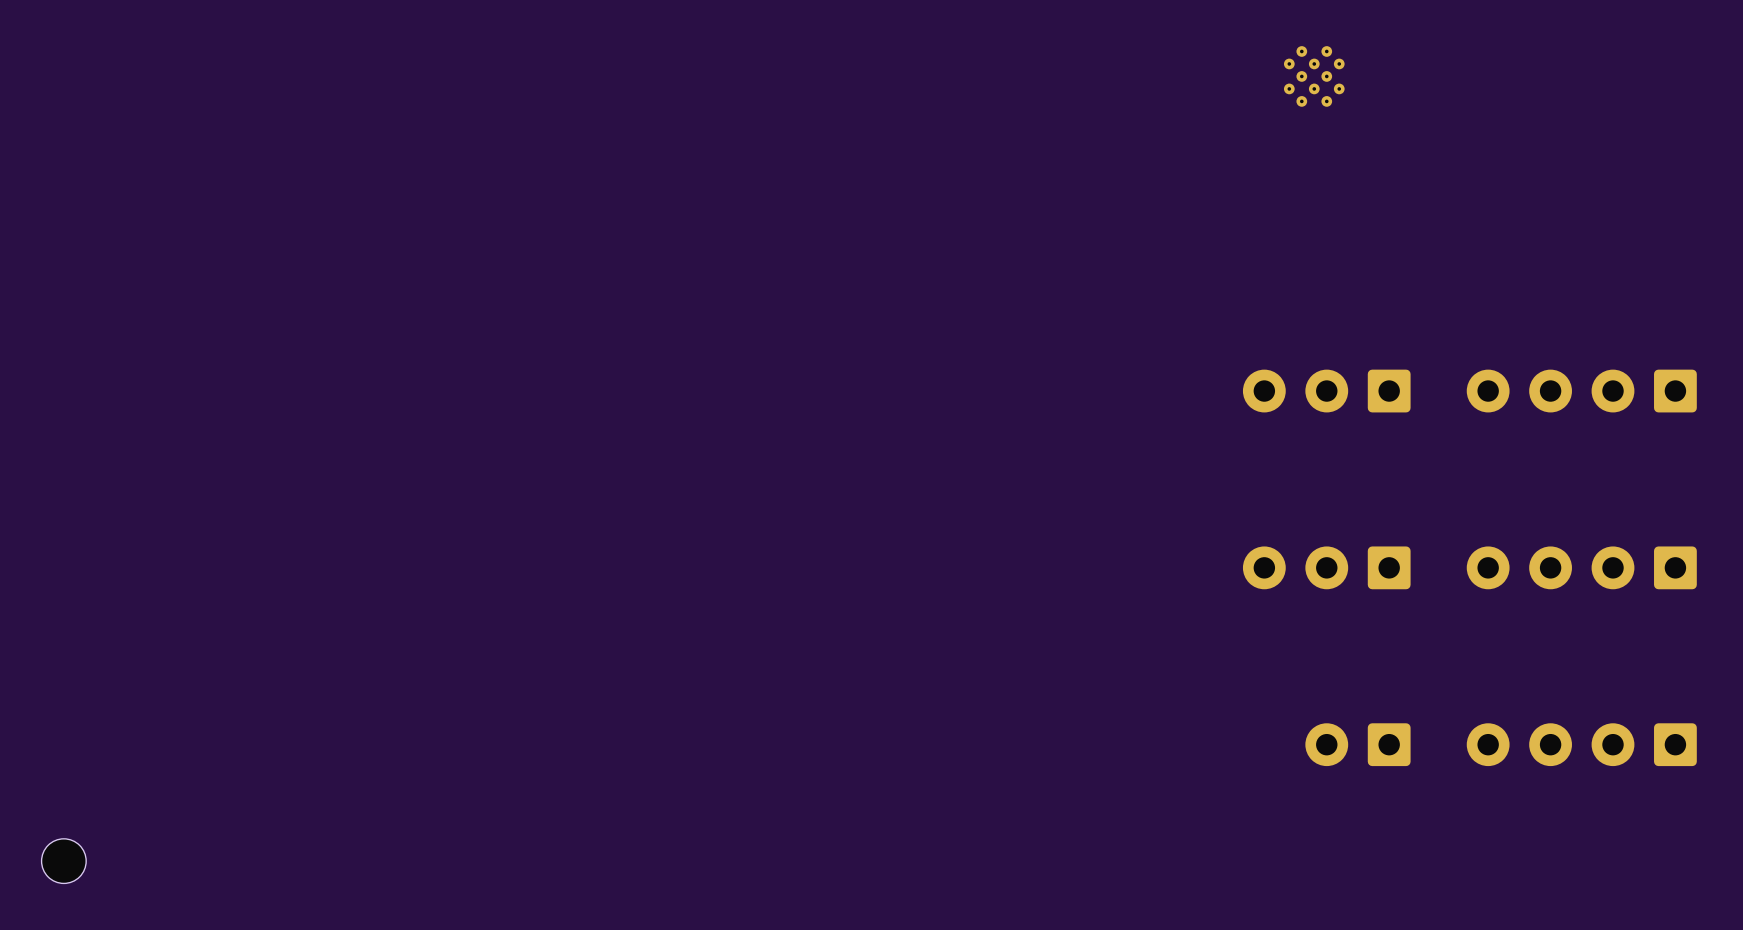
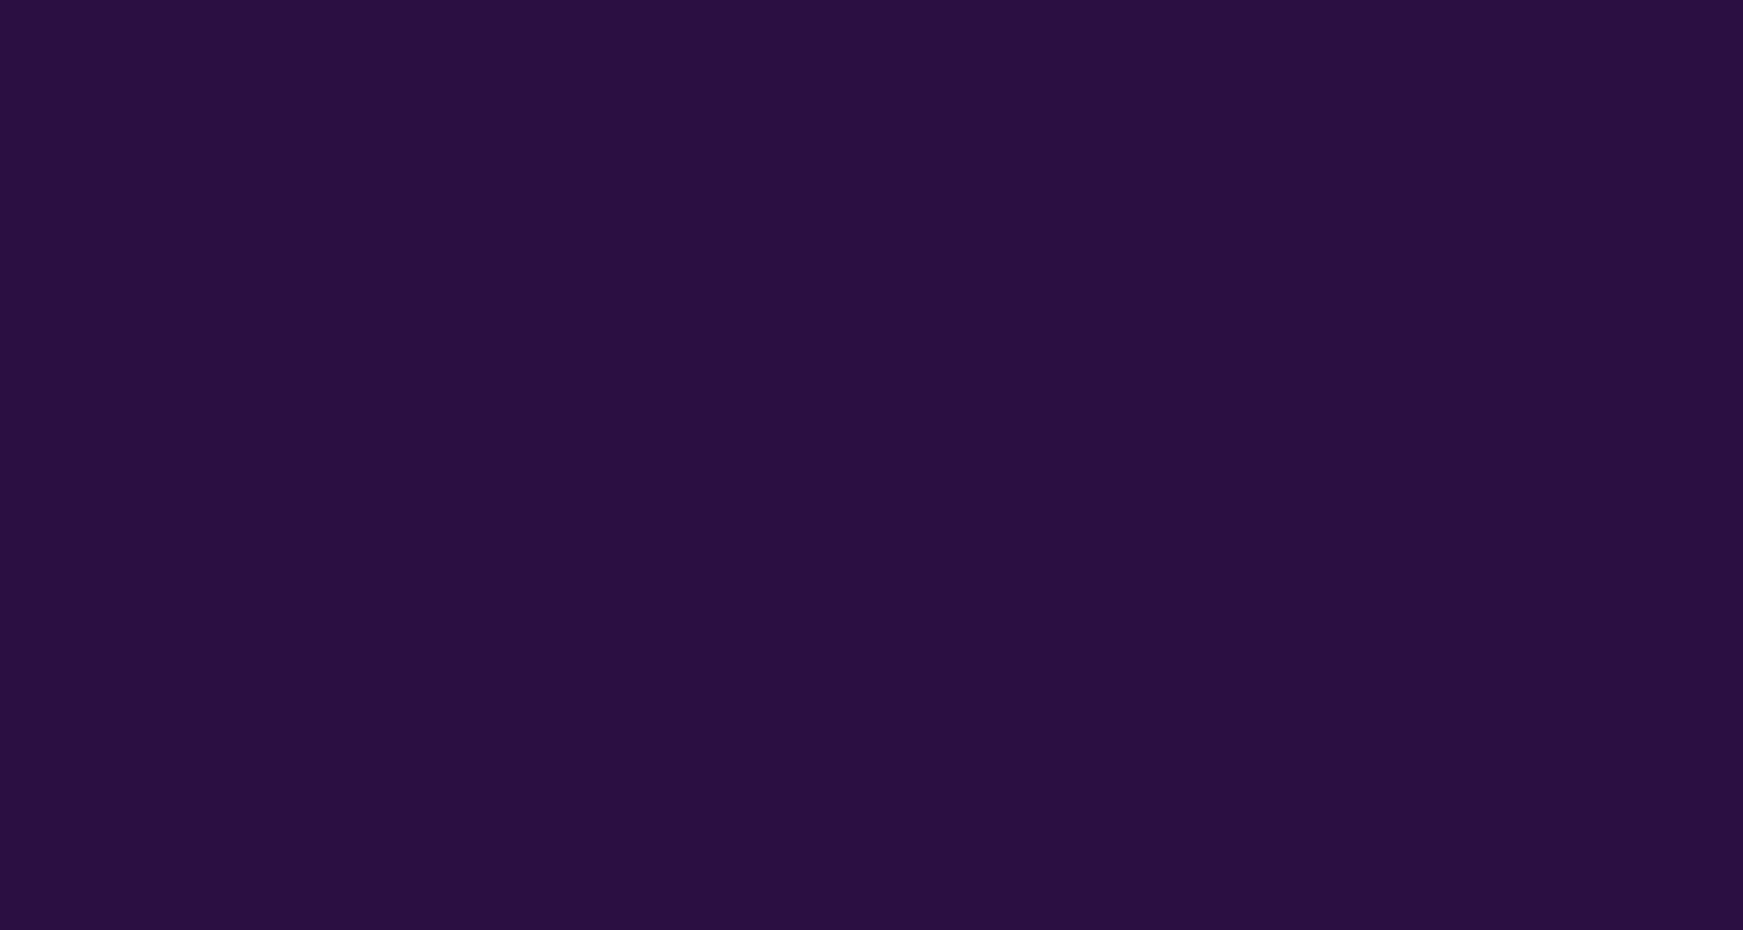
part: (1314, 76) -> none
part: (1326, 391) -> none
part: (1581, 391) -> none
part: (1326, 567) -> none
part: (1581, 567) -> none
part: (1357, 744) -> none
part: (1581, 744) -> none
part: (63, 861) -> none

